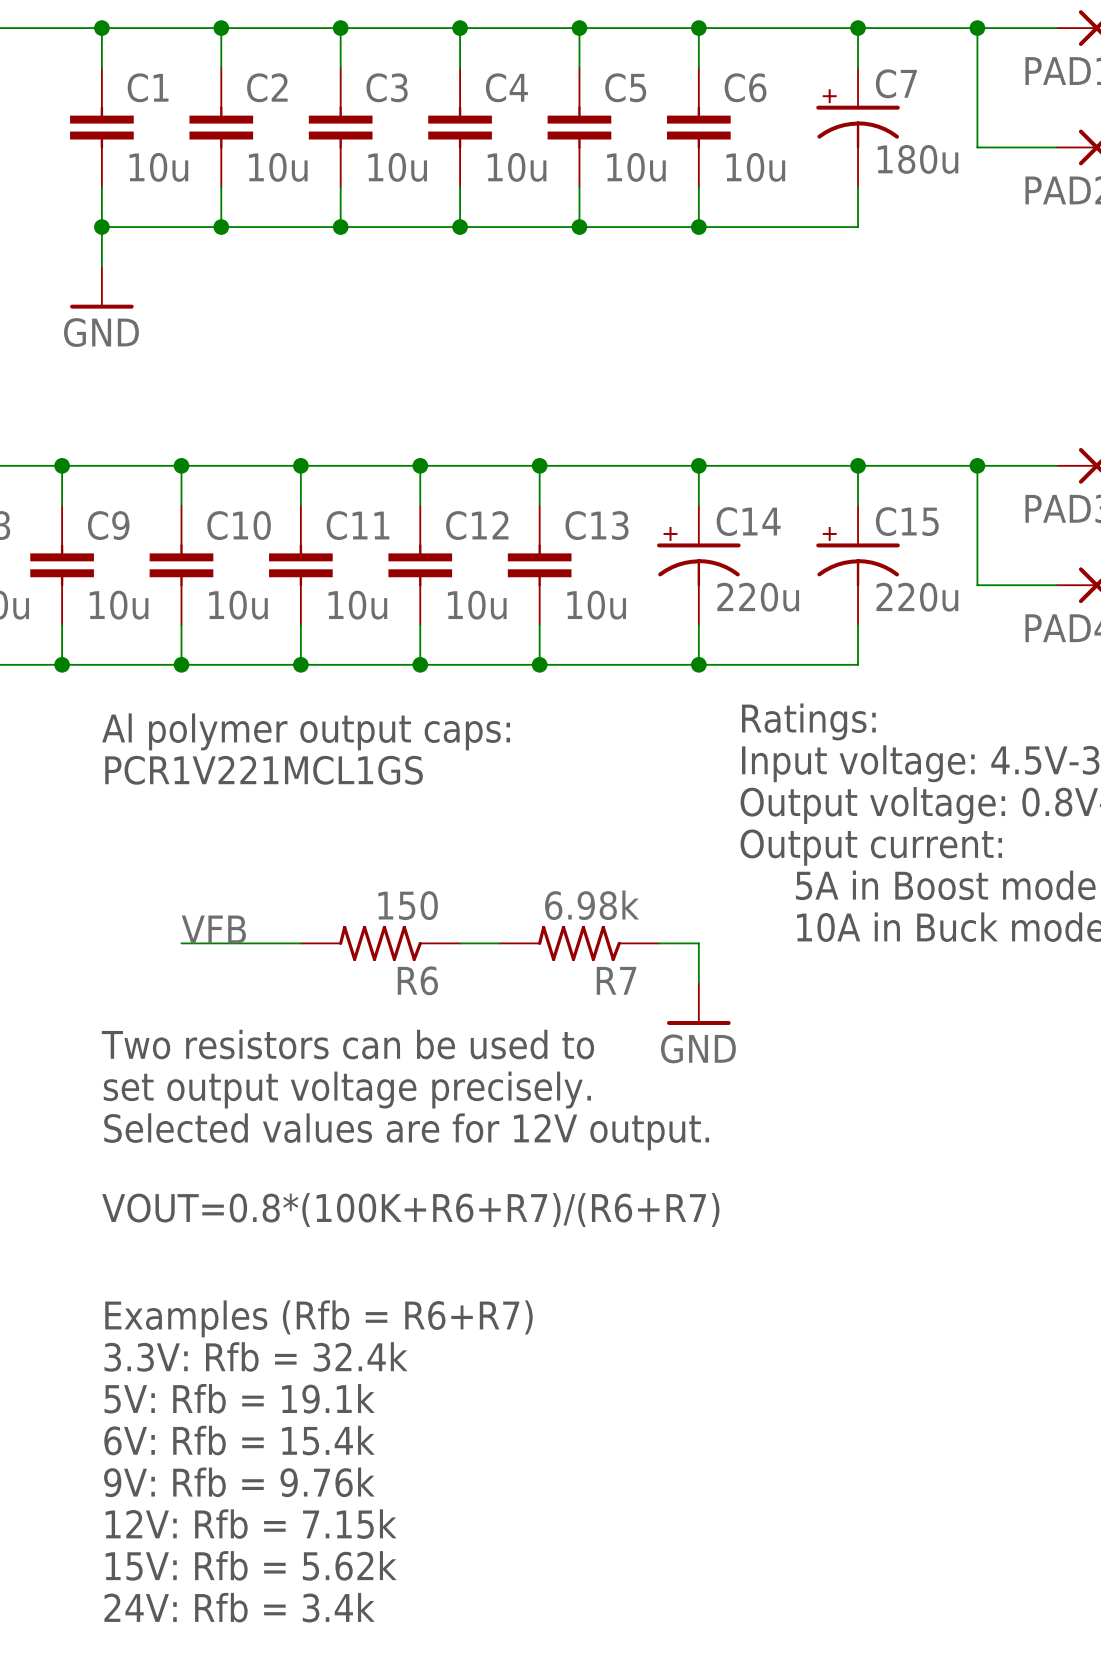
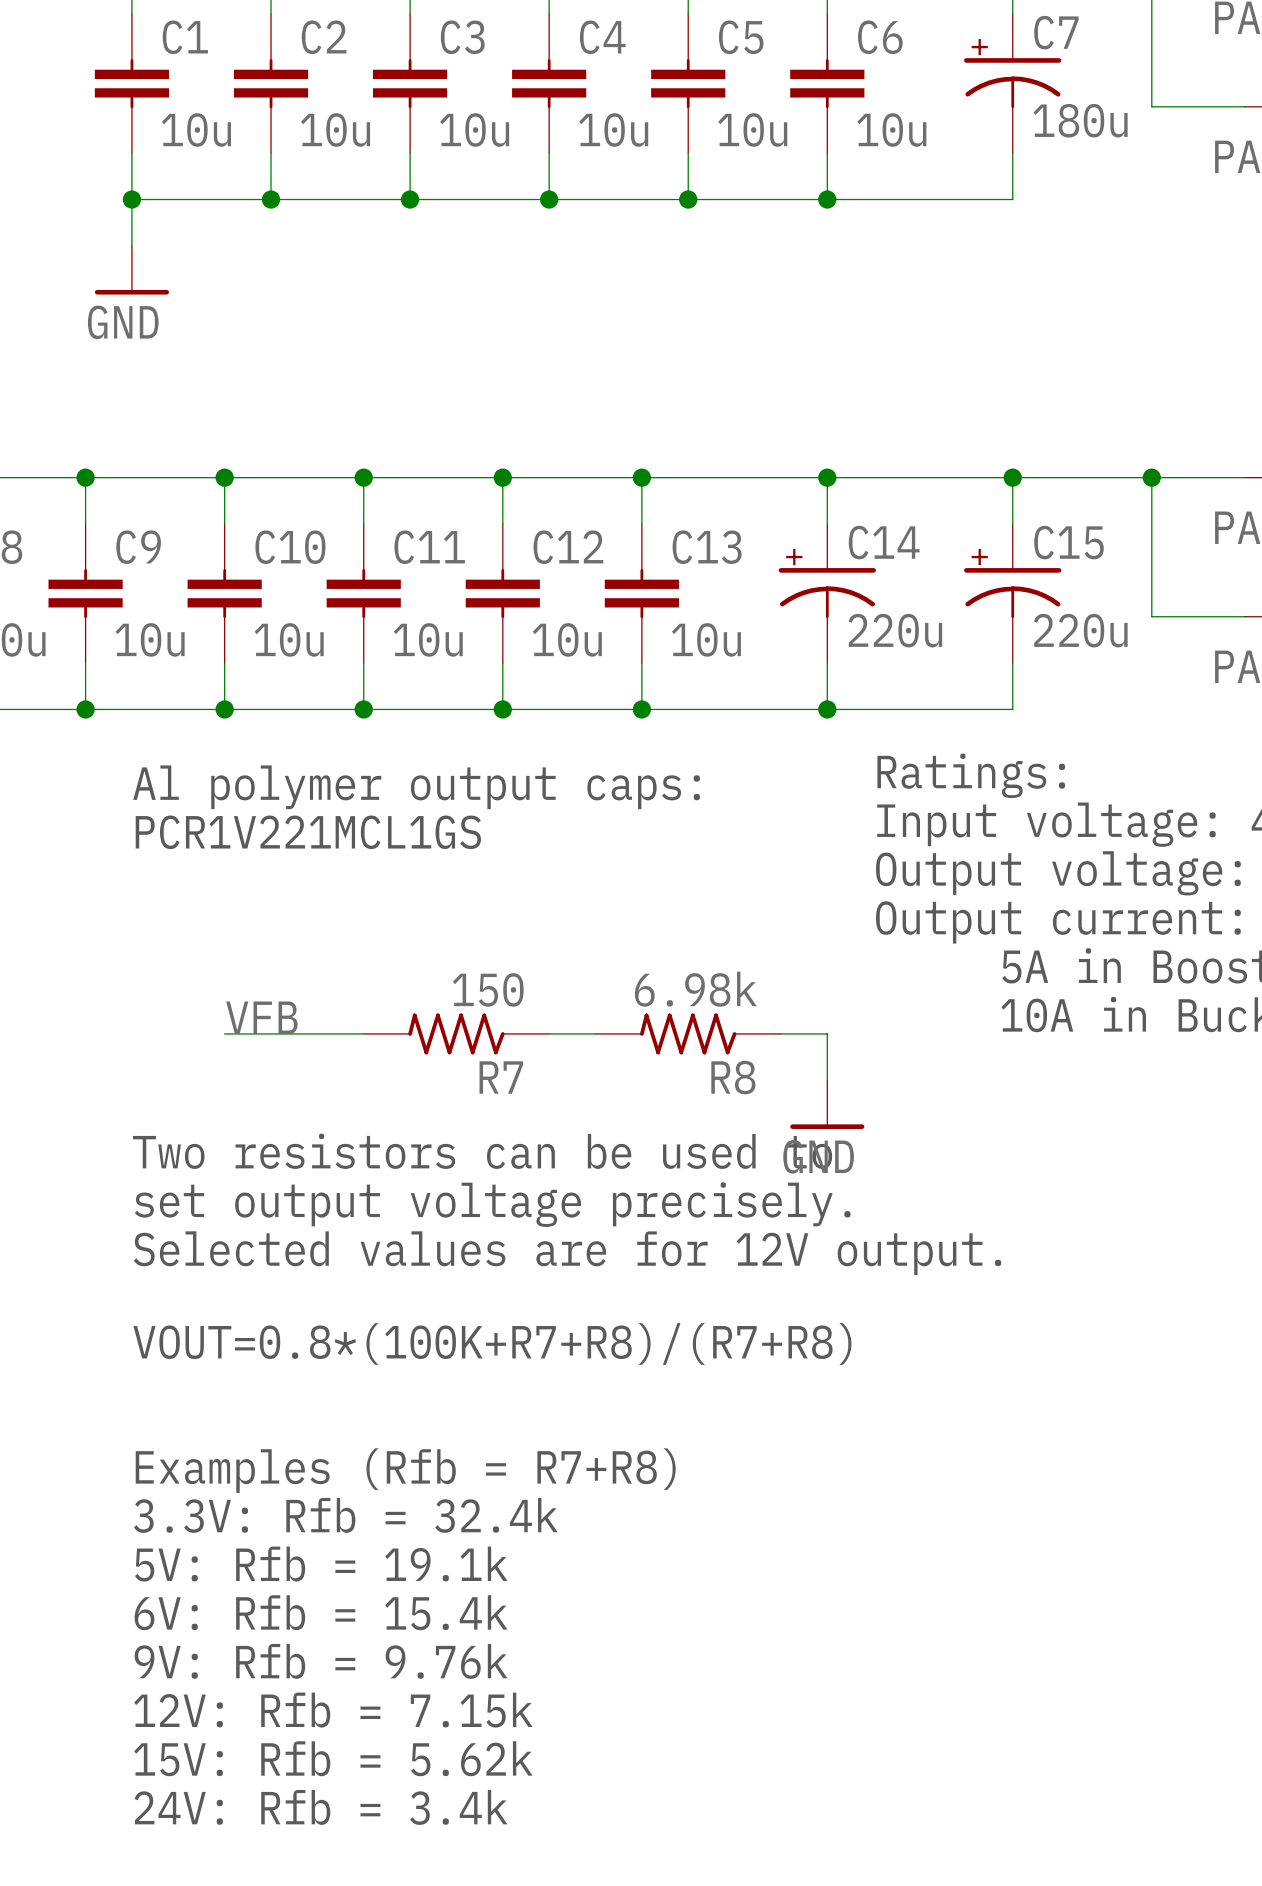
R6 name: R6 (417, 980) -> R7 (501, 1077)
R7 name: R7 (616, 980) -> R8 (733, 1077)
text: VOUT=0.8*(100K+R6+R7)/(R6+R7) (410, 1209) -> VOUT=0.8*(100K+R7+R8)/(R7+R8) (492, 1343)
text: Examples (Rfb = R6+R7) (318, 1318) -> Examples (Rfb = R7+R8) (405, 1470)

